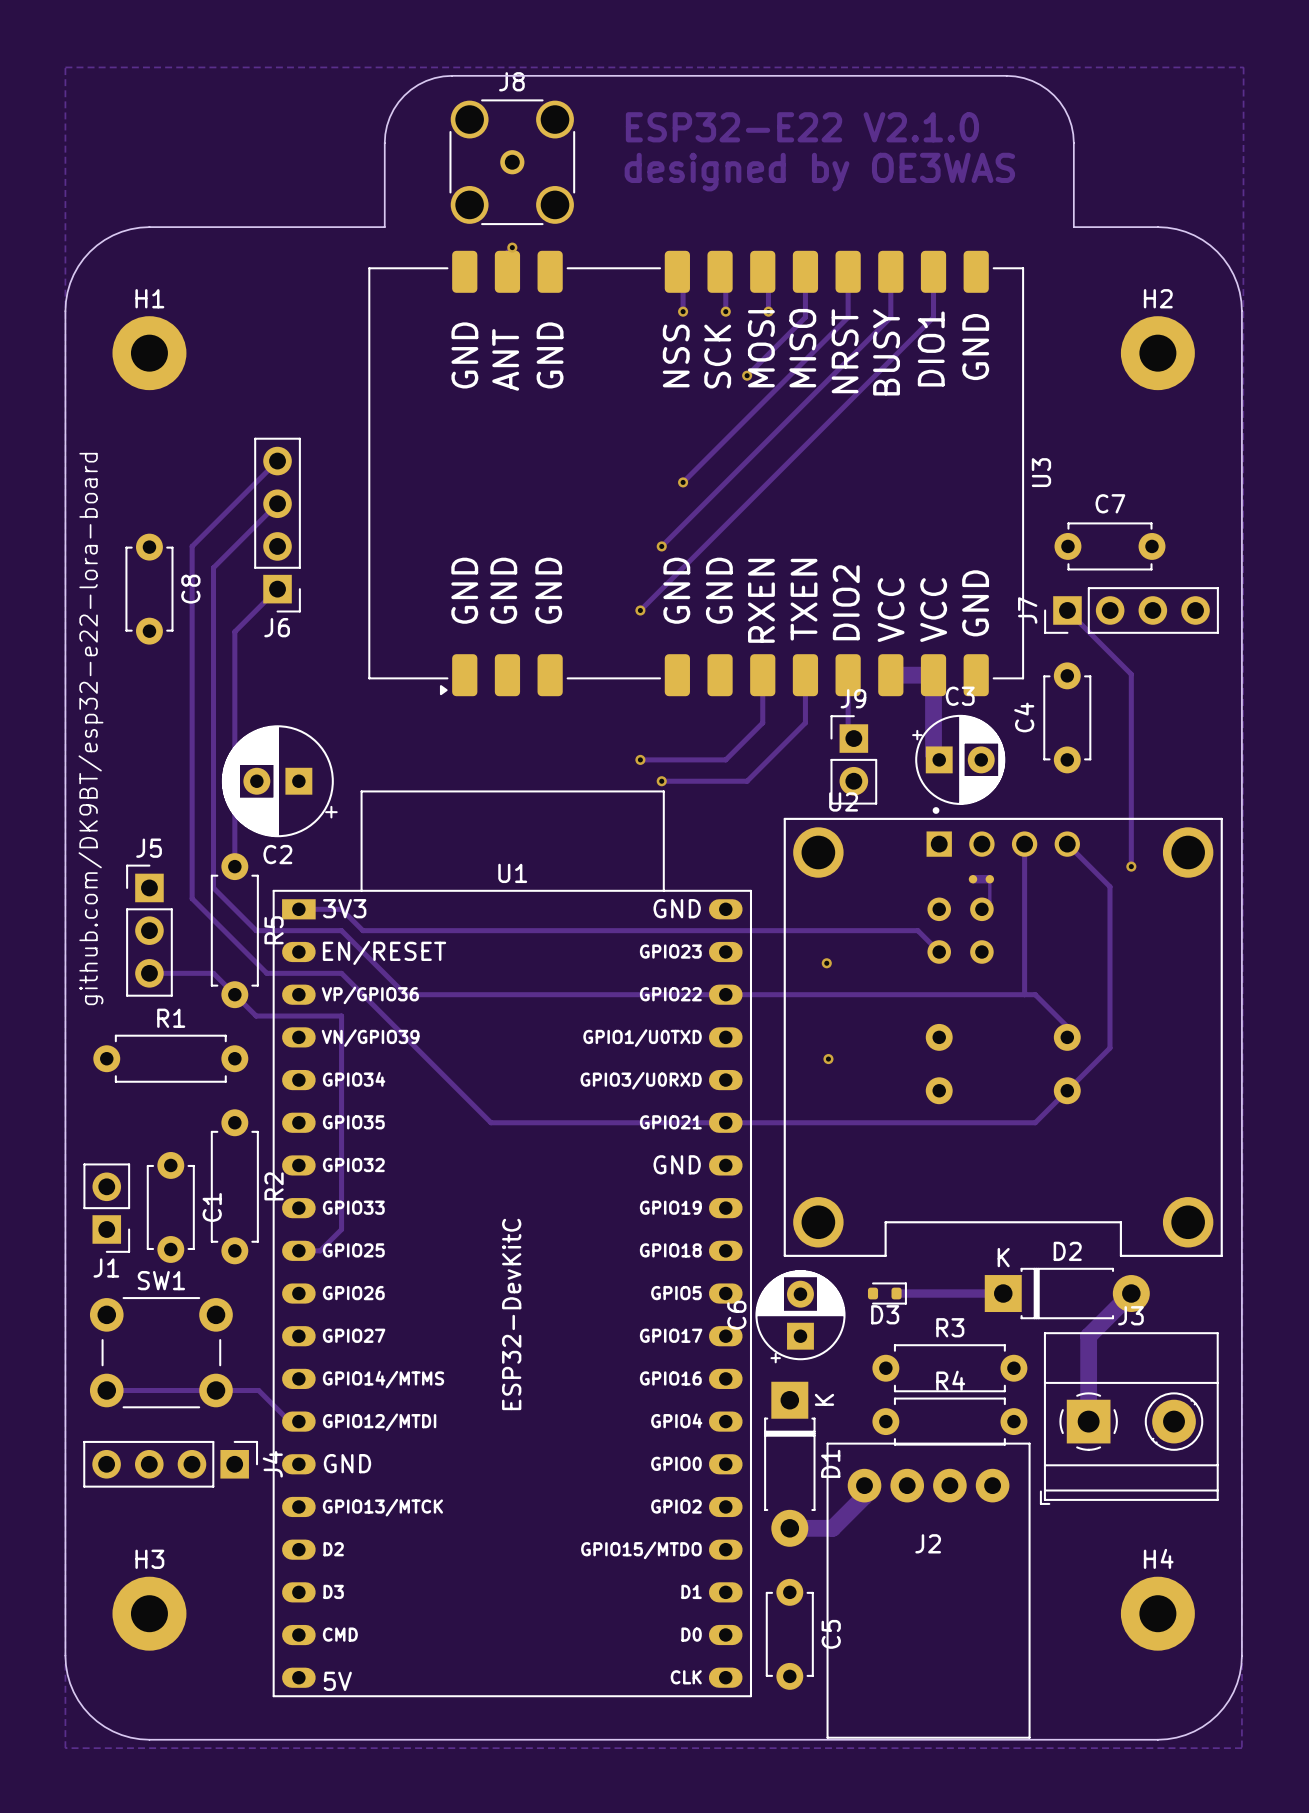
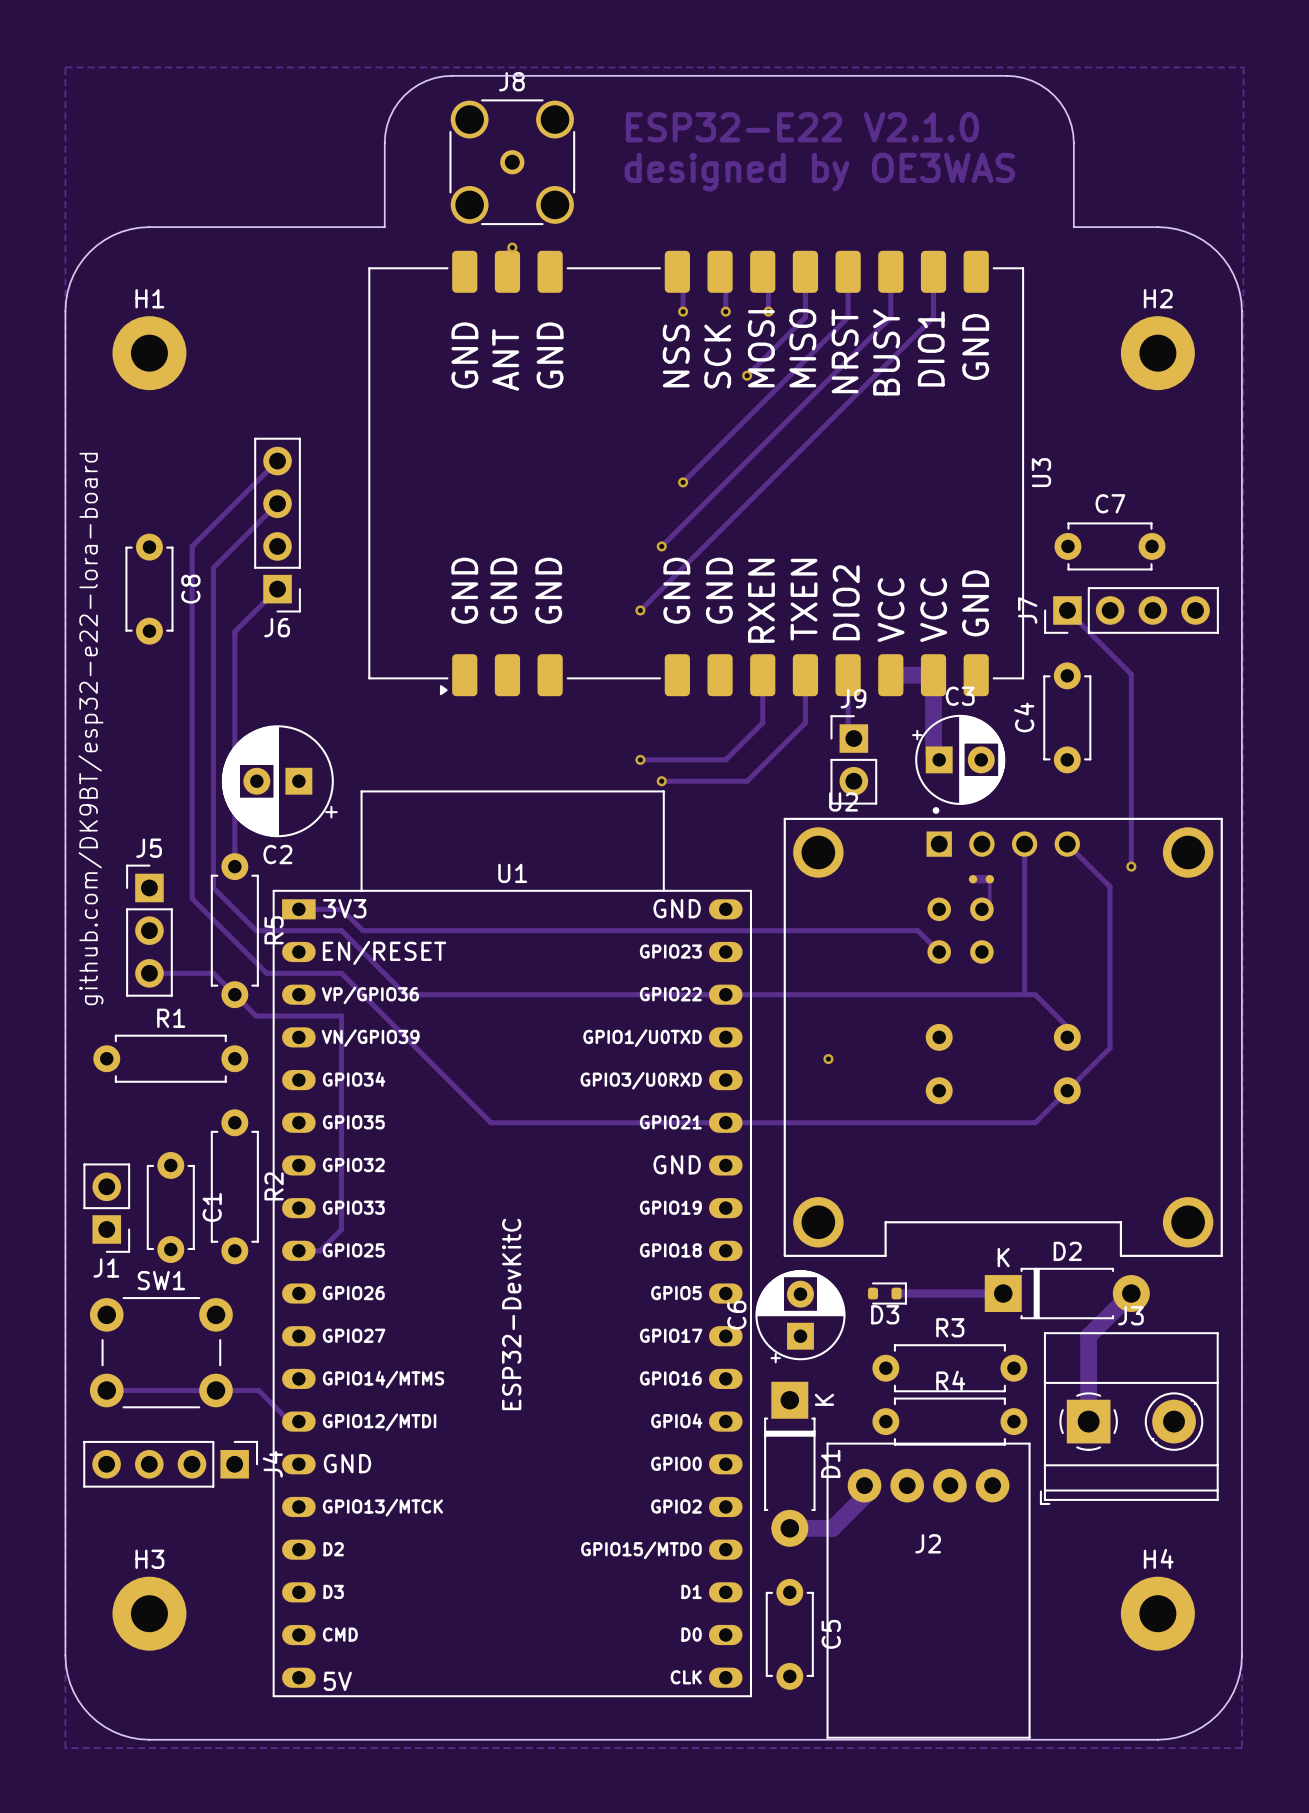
via: (826, 963) -> none

